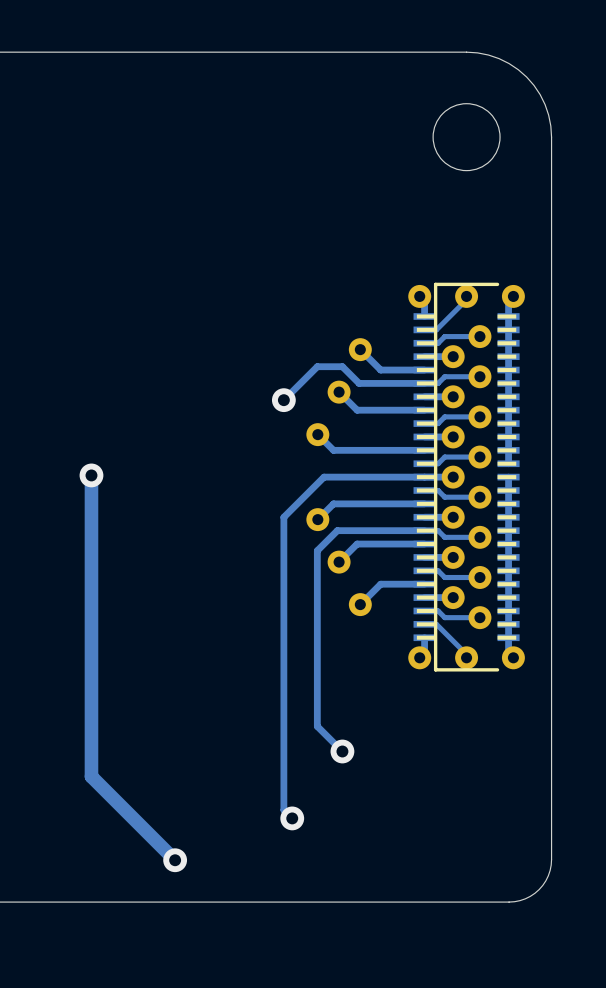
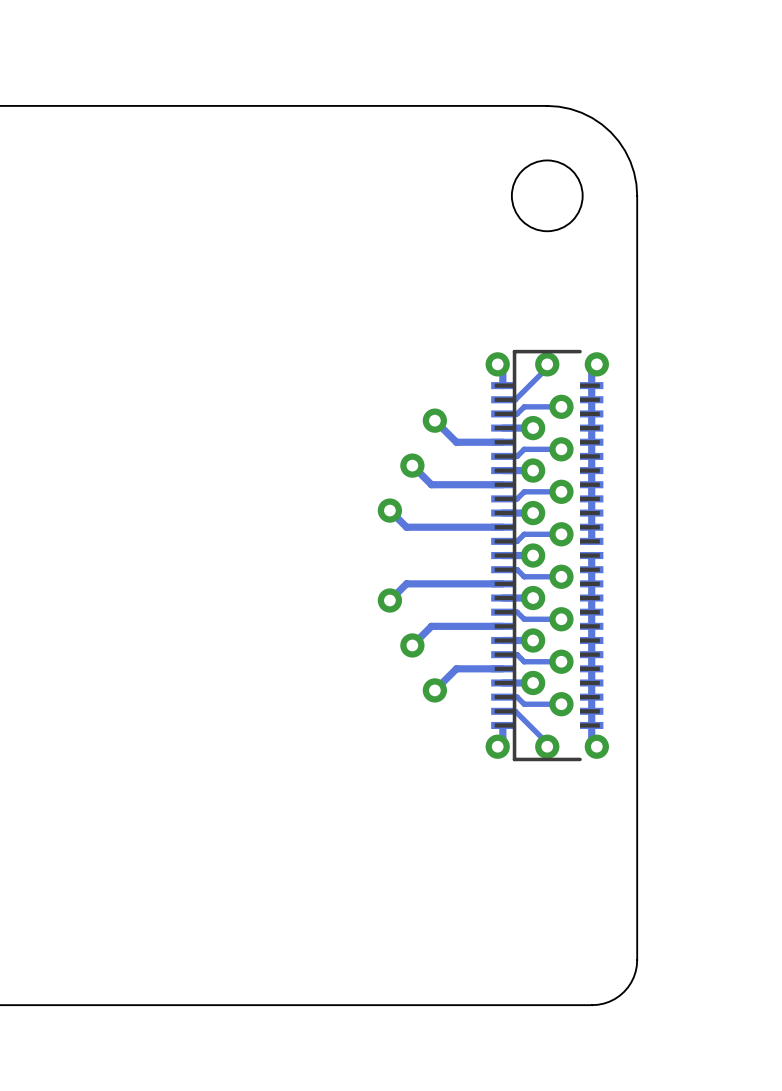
track: (424, 383) (359, 383) (342, 366) (317, 366) (283, 400) -> none
via: (283, 400) -> none
track: (91, 475) (91, 776) (175, 860) -> none
via: (91, 475) -> none
track: (424, 477) (324, 477) (283, 517) (283, 810) (292, 818) -> none
track: (424, 530) (337, 530) (317, 550) (317, 726) (342, 751) -> none
via: (342, 751) -> none
via: (292, 818) -> none
via: (175, 860) -> none

